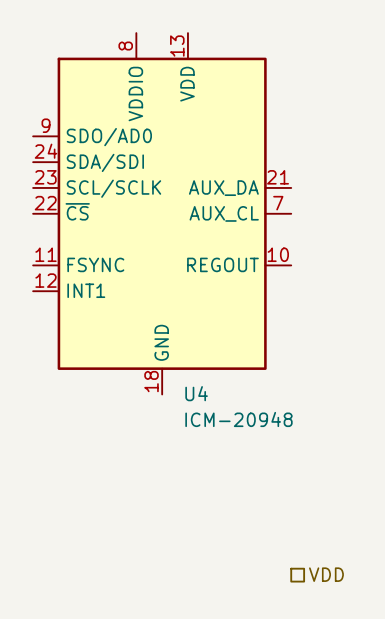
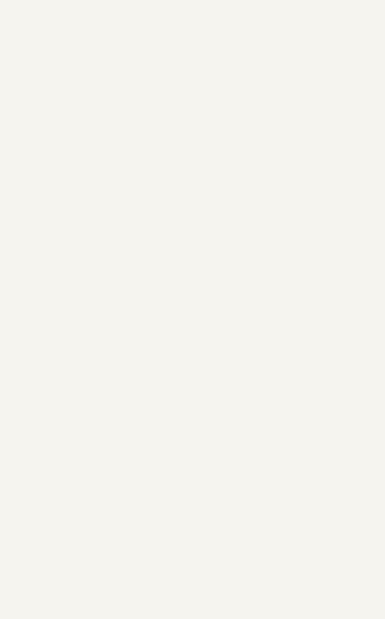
U4: ICM-20948 (162, 213) -> none
hierarchical label: VDD (326, 574) -> none

